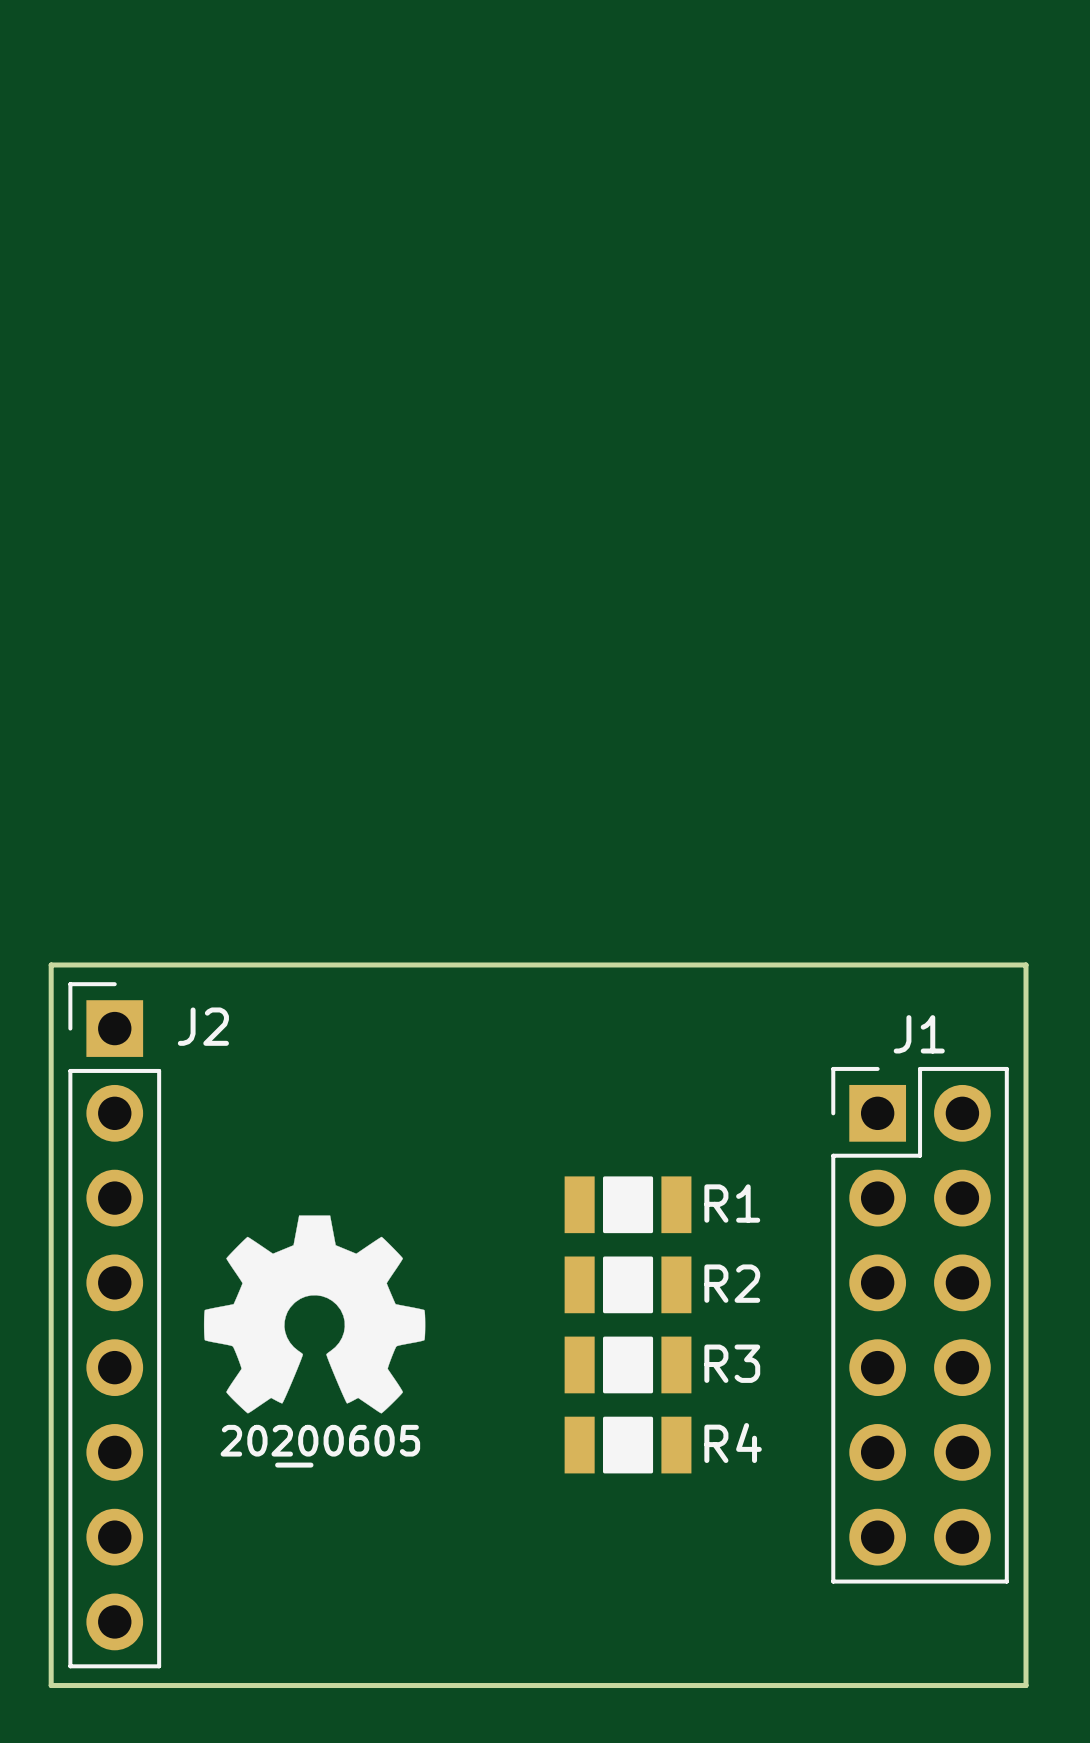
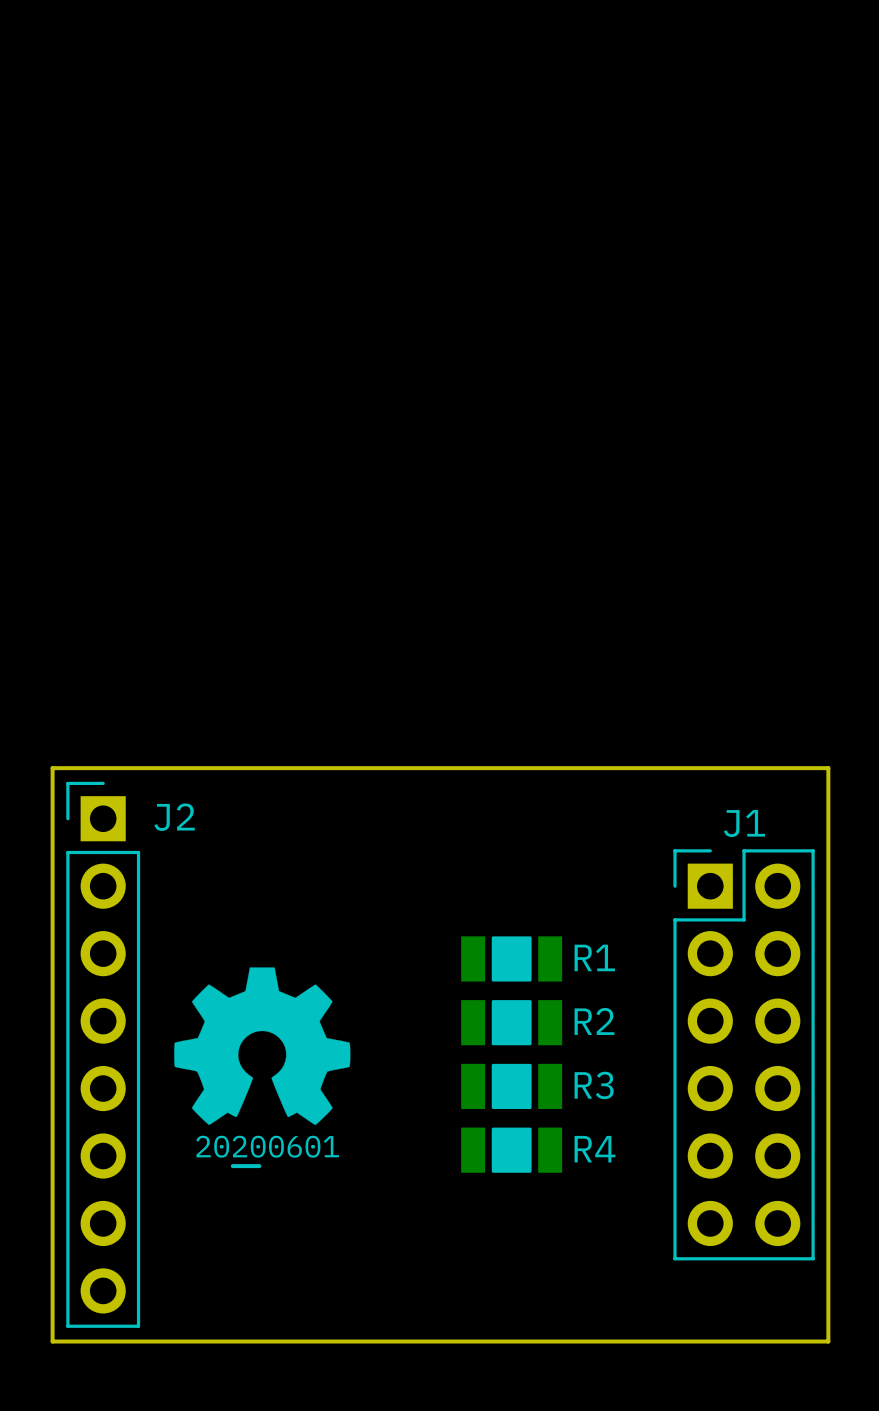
drawing shape: [220, 1424, 421, 1468] -> [196, 1135, 339, 1169]

